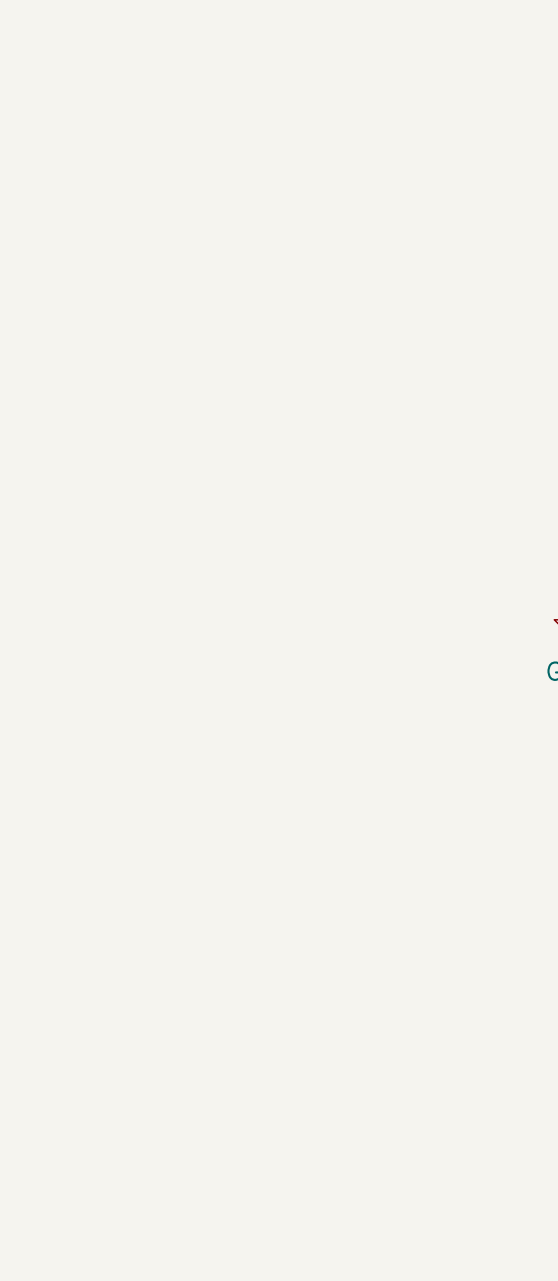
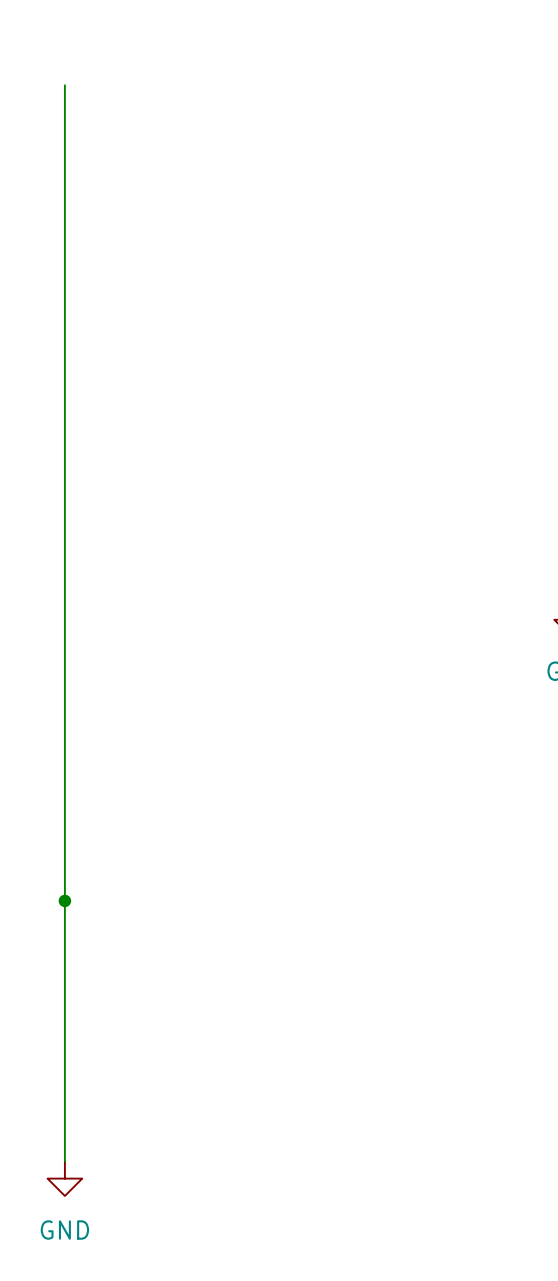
wire: none -> (64, 85) (64, 1161)
junction: none -> (64, 900)
power symbol: none -> GND (64, 1178)

